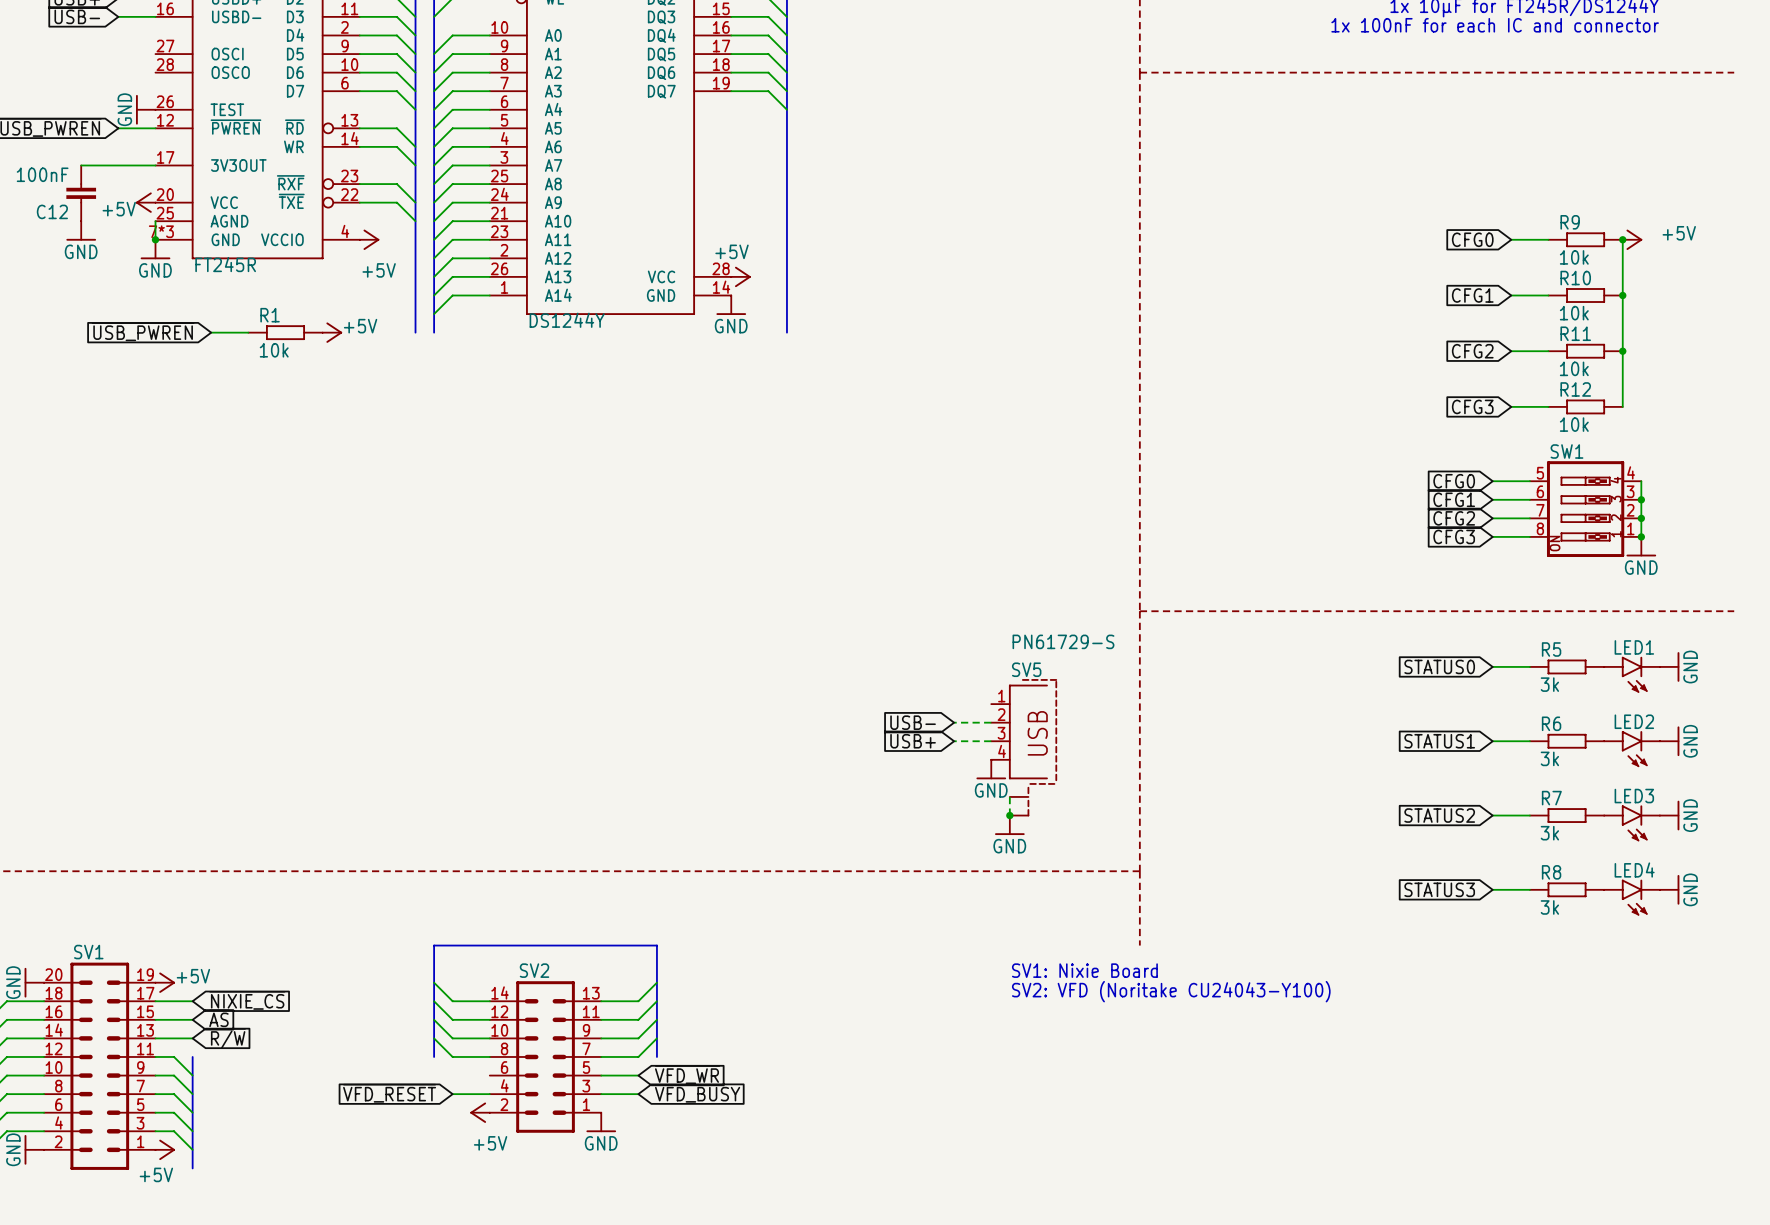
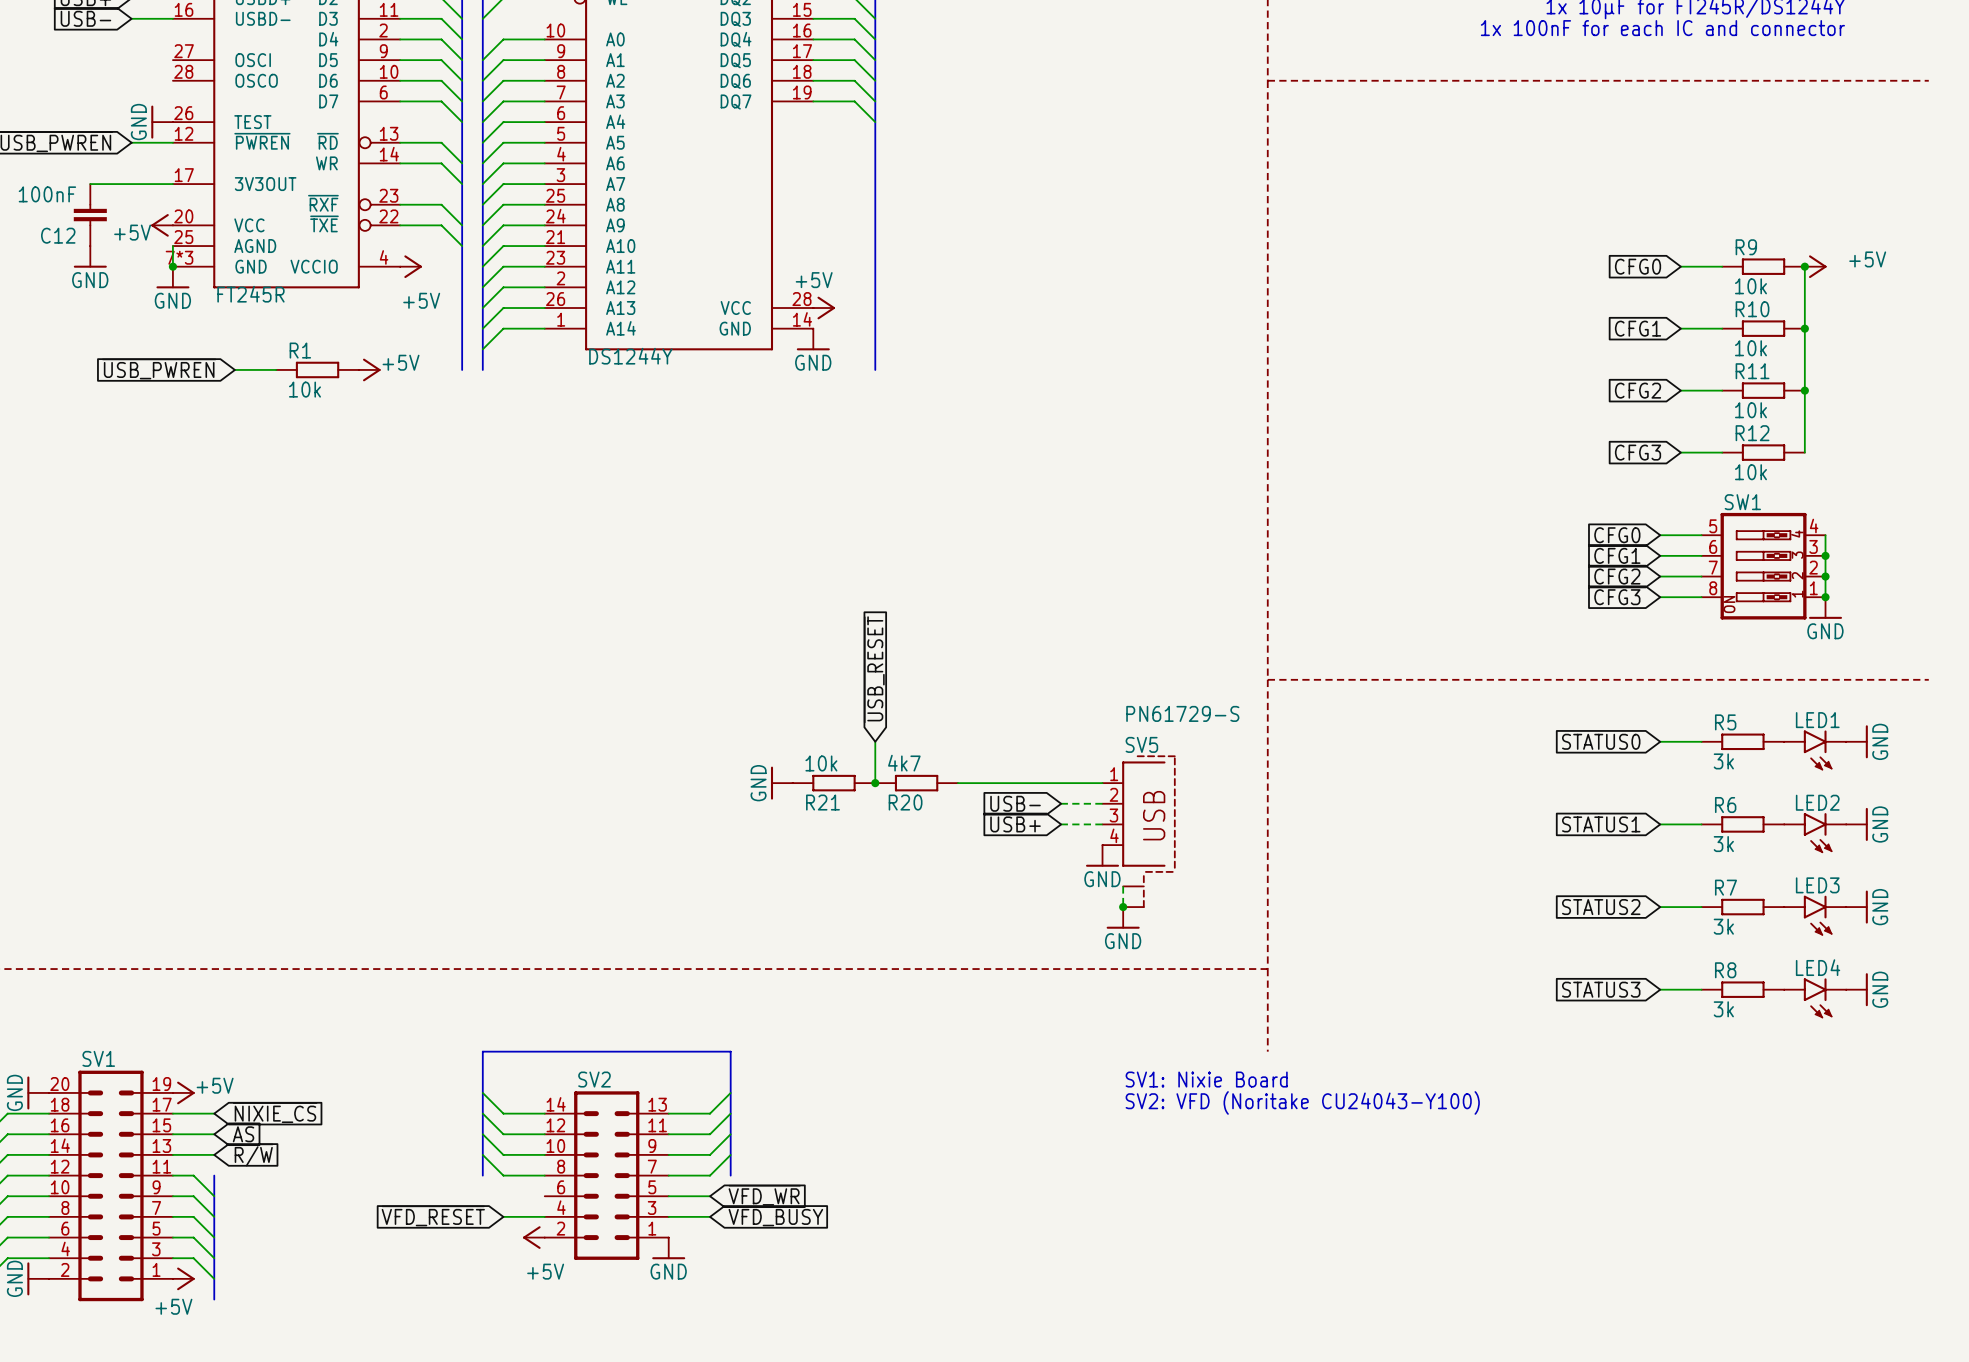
global label: none -> ~{USB_RESET} (874, 669)
wire: none -> (875, 741) (875, 783)
power symbol: none -> GND (781, 783)
R21: none -> 10k (833, 783)
junction: none -> (875, 783)
R20: none -> 4k7 (916, 783)
wire: none -> (957, 783) (1102, 783)

